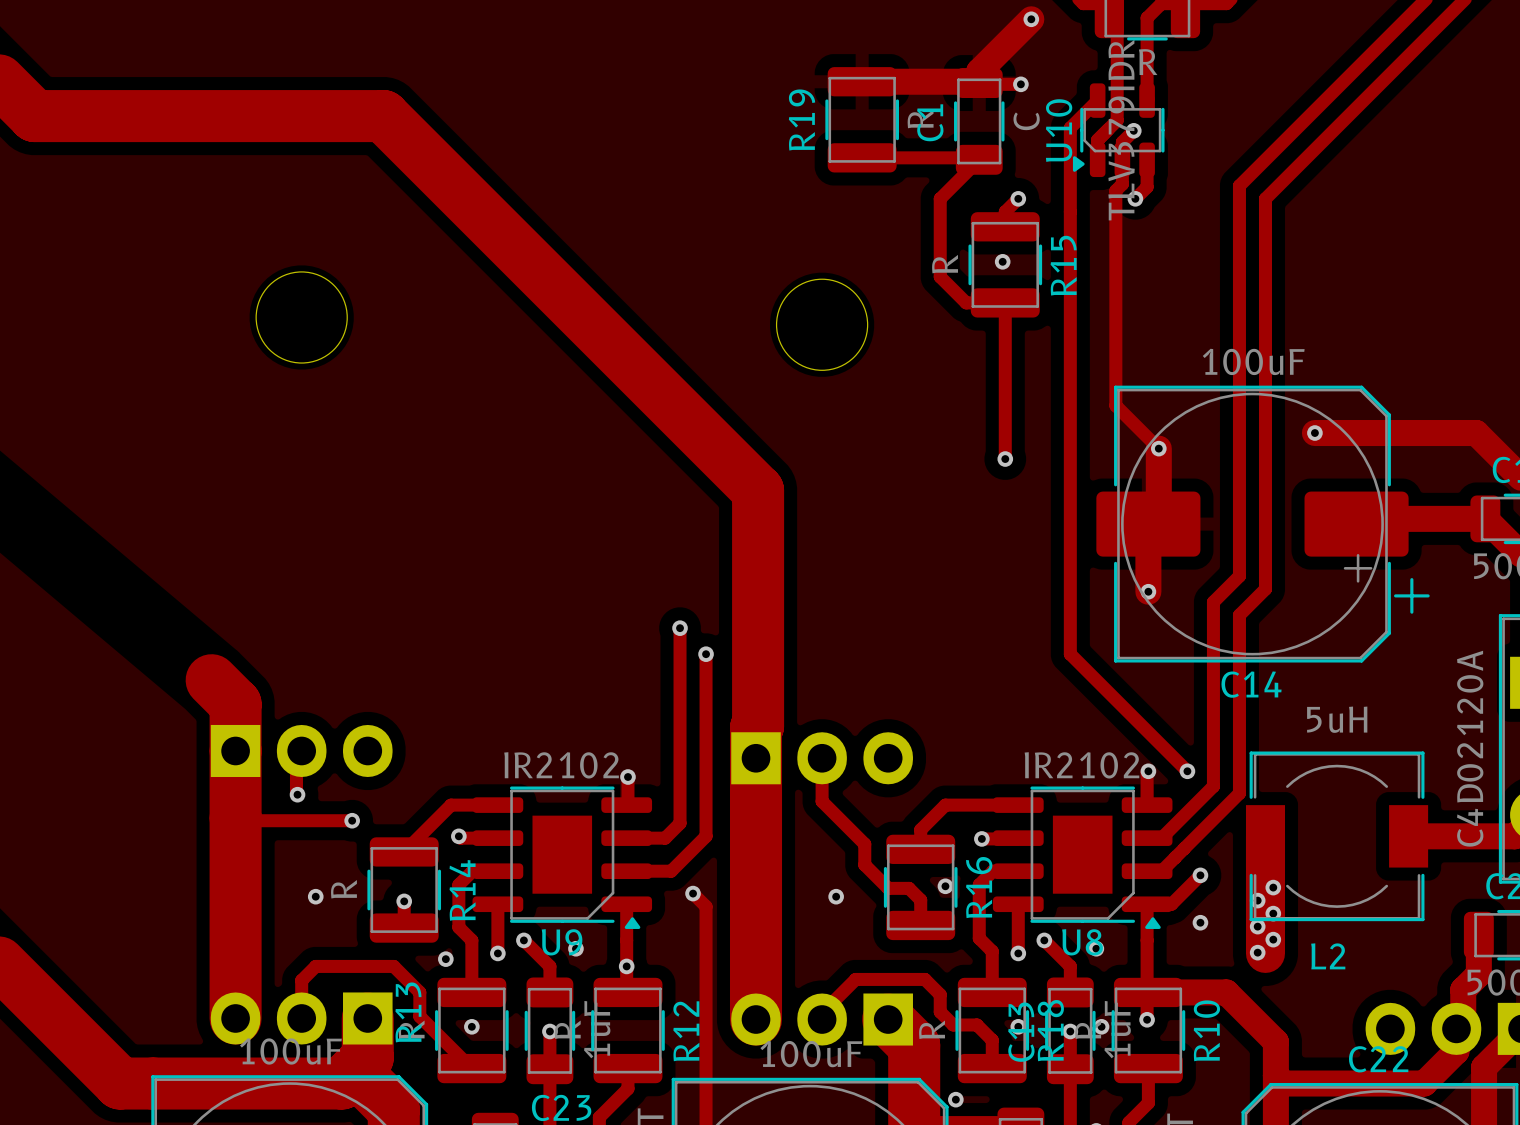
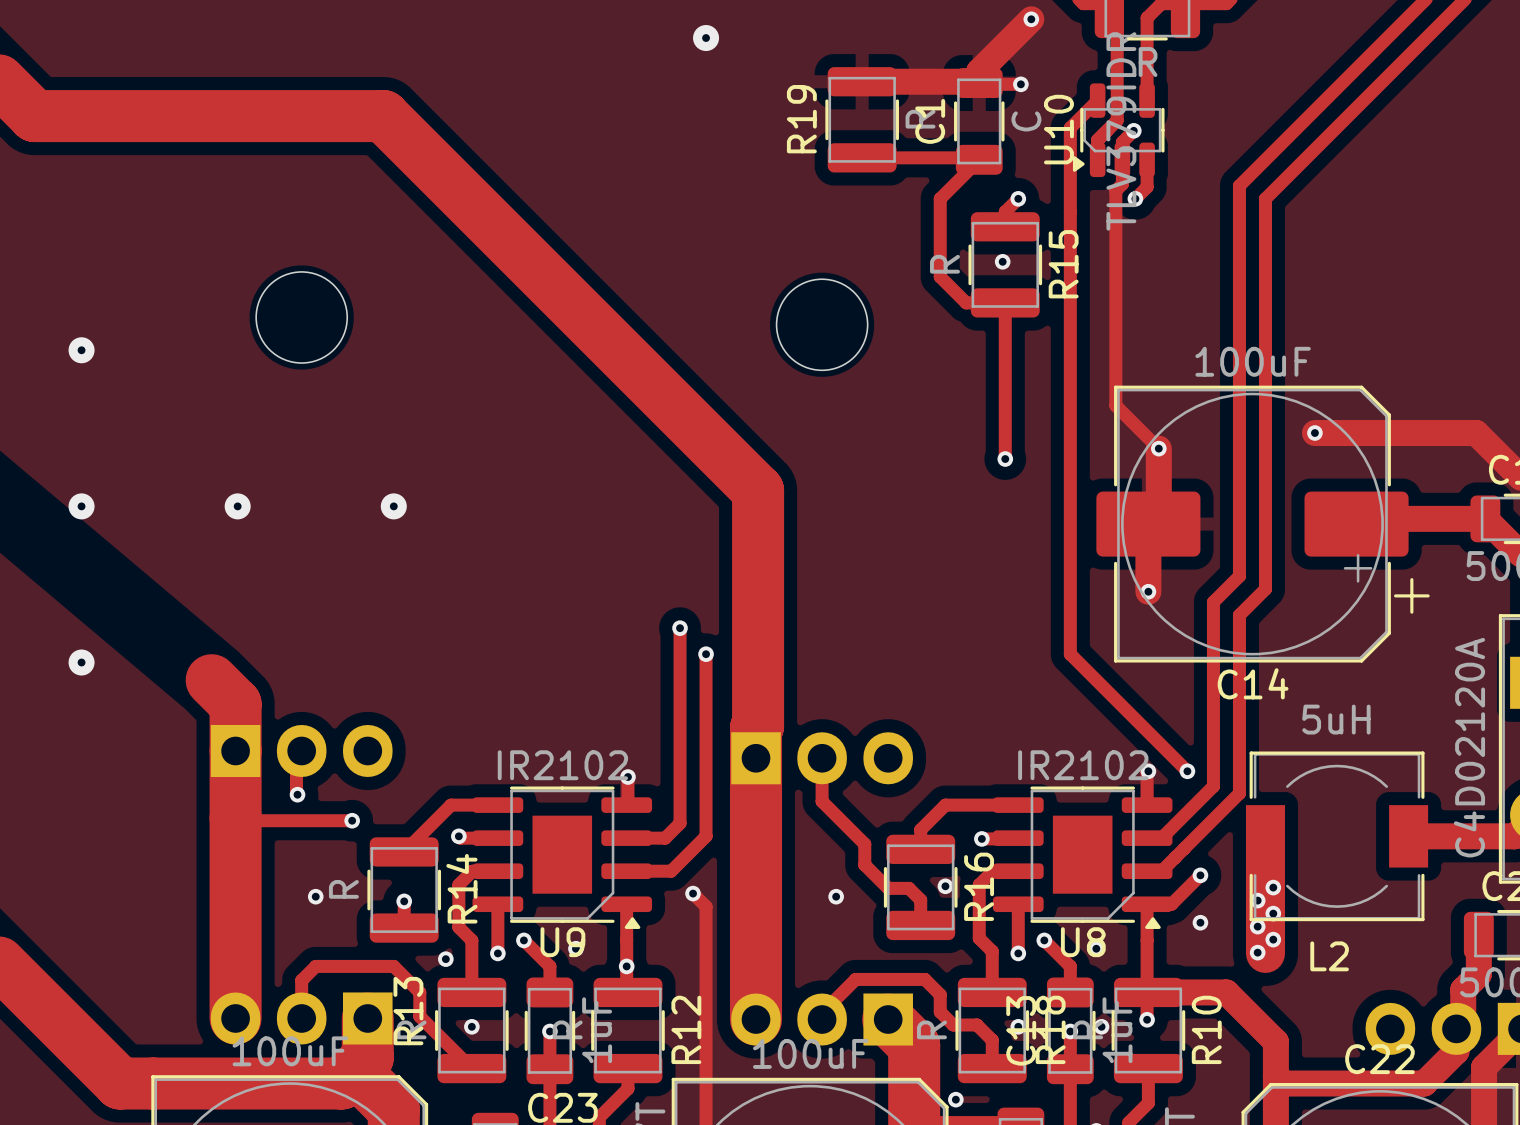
via: none -> (706, 38)
via: none -> (81, 350)
via: none -> (81, 506)
via: none -> (237, 506)
via: none -> (393, 506)
via: none -> (81, 662)

